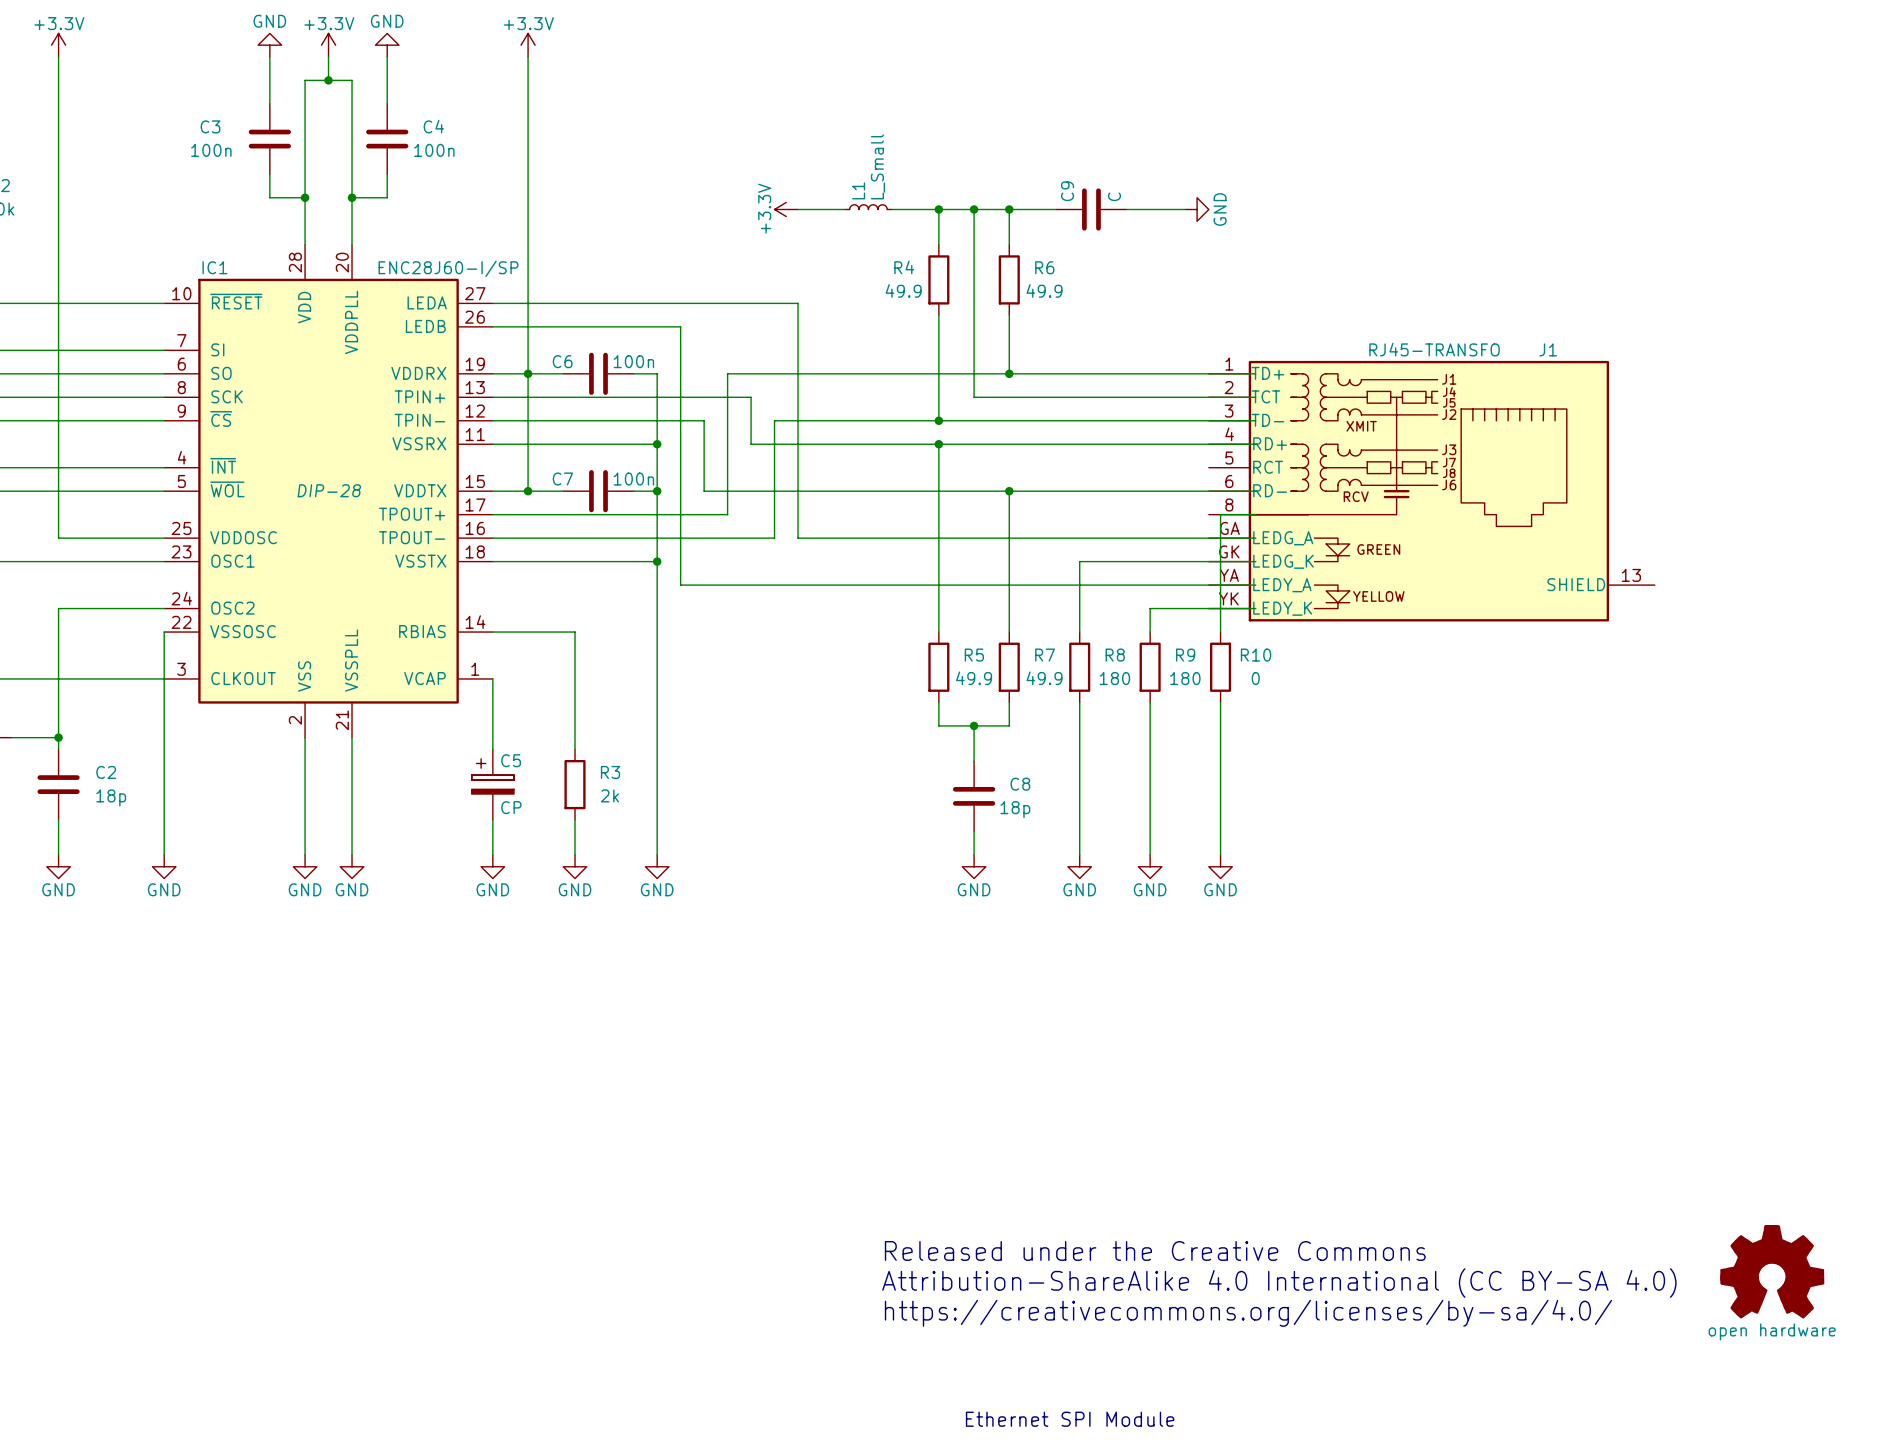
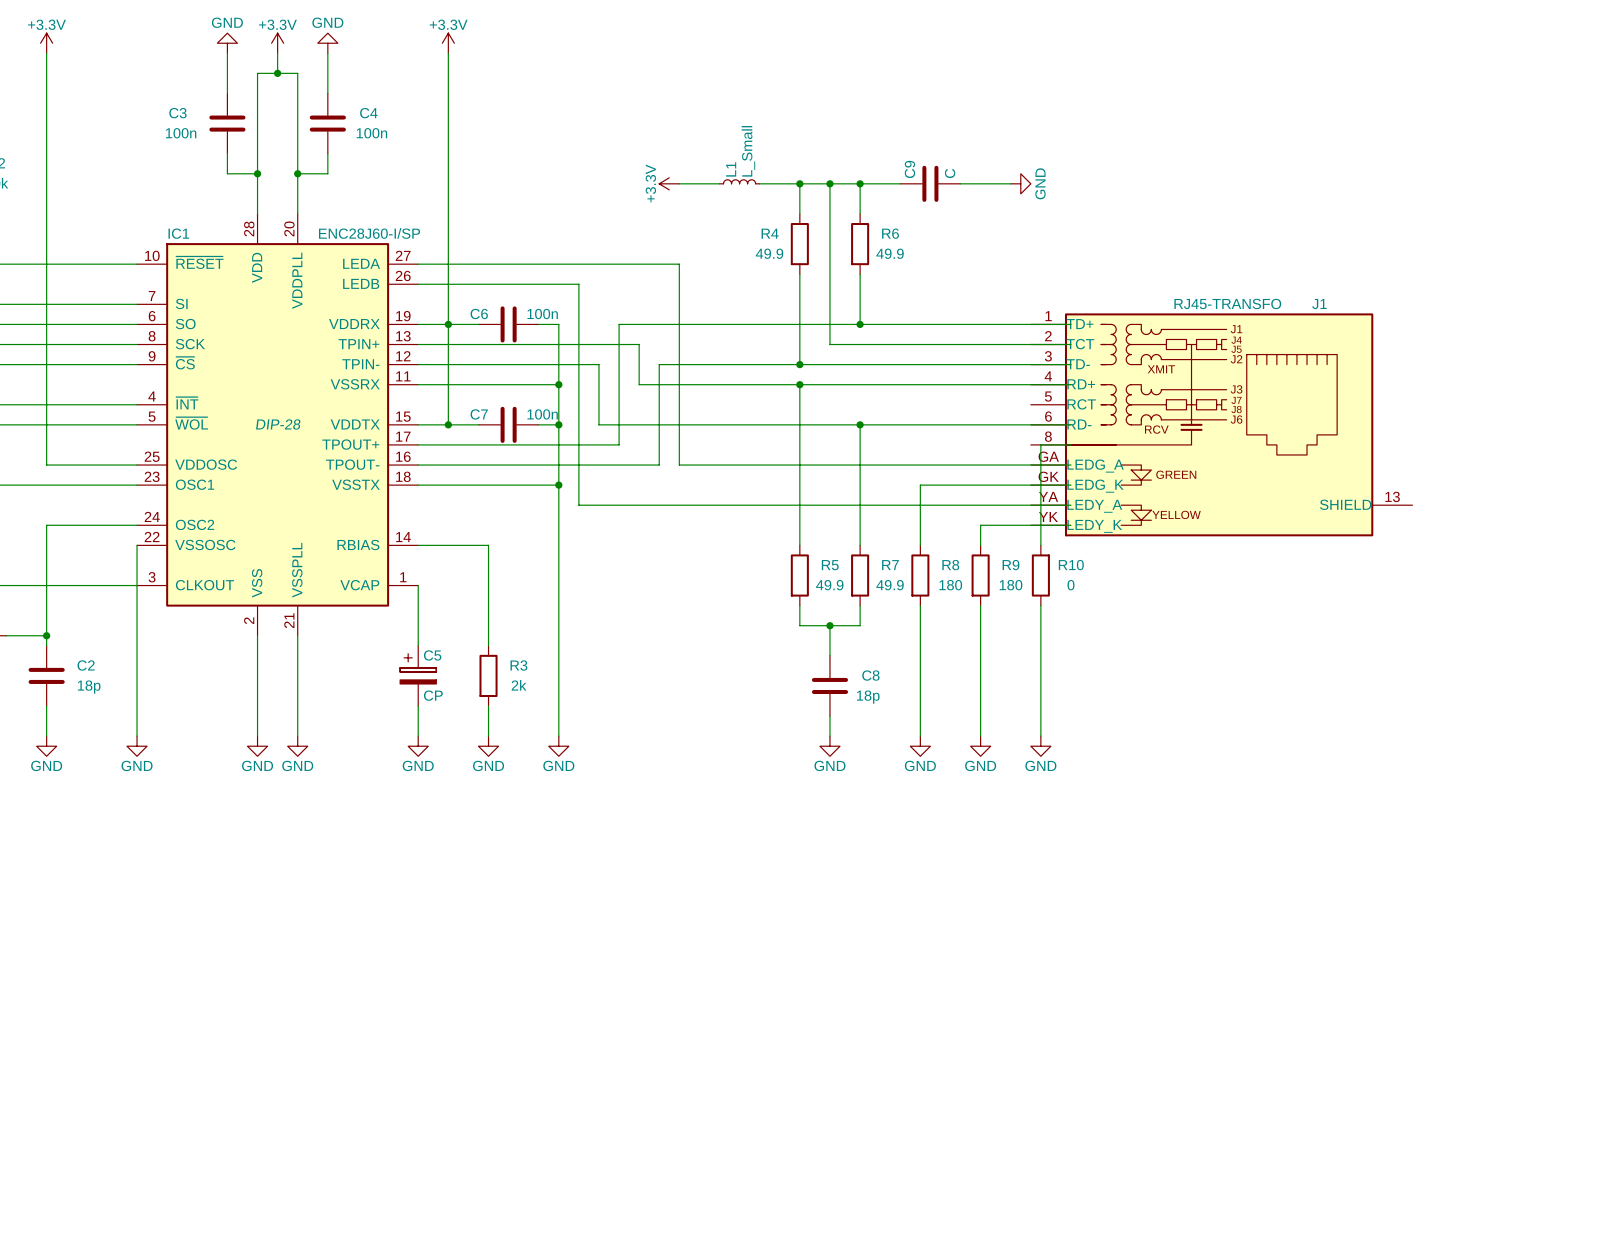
text: Released under the Creative Commons (1155, 1250) -> none
power symbol: open hardware (1772, 1271) -> none
text: Attribution-ShareAlike 4.0 International (CC BY-SA 4.0) (1279, 1283) -> none
text: https://creativecommons.org/licenses/by-sa/4.0/ (1248, 1313) -> none
text: Ethernet SPI Module (1070, 1419) -> none

